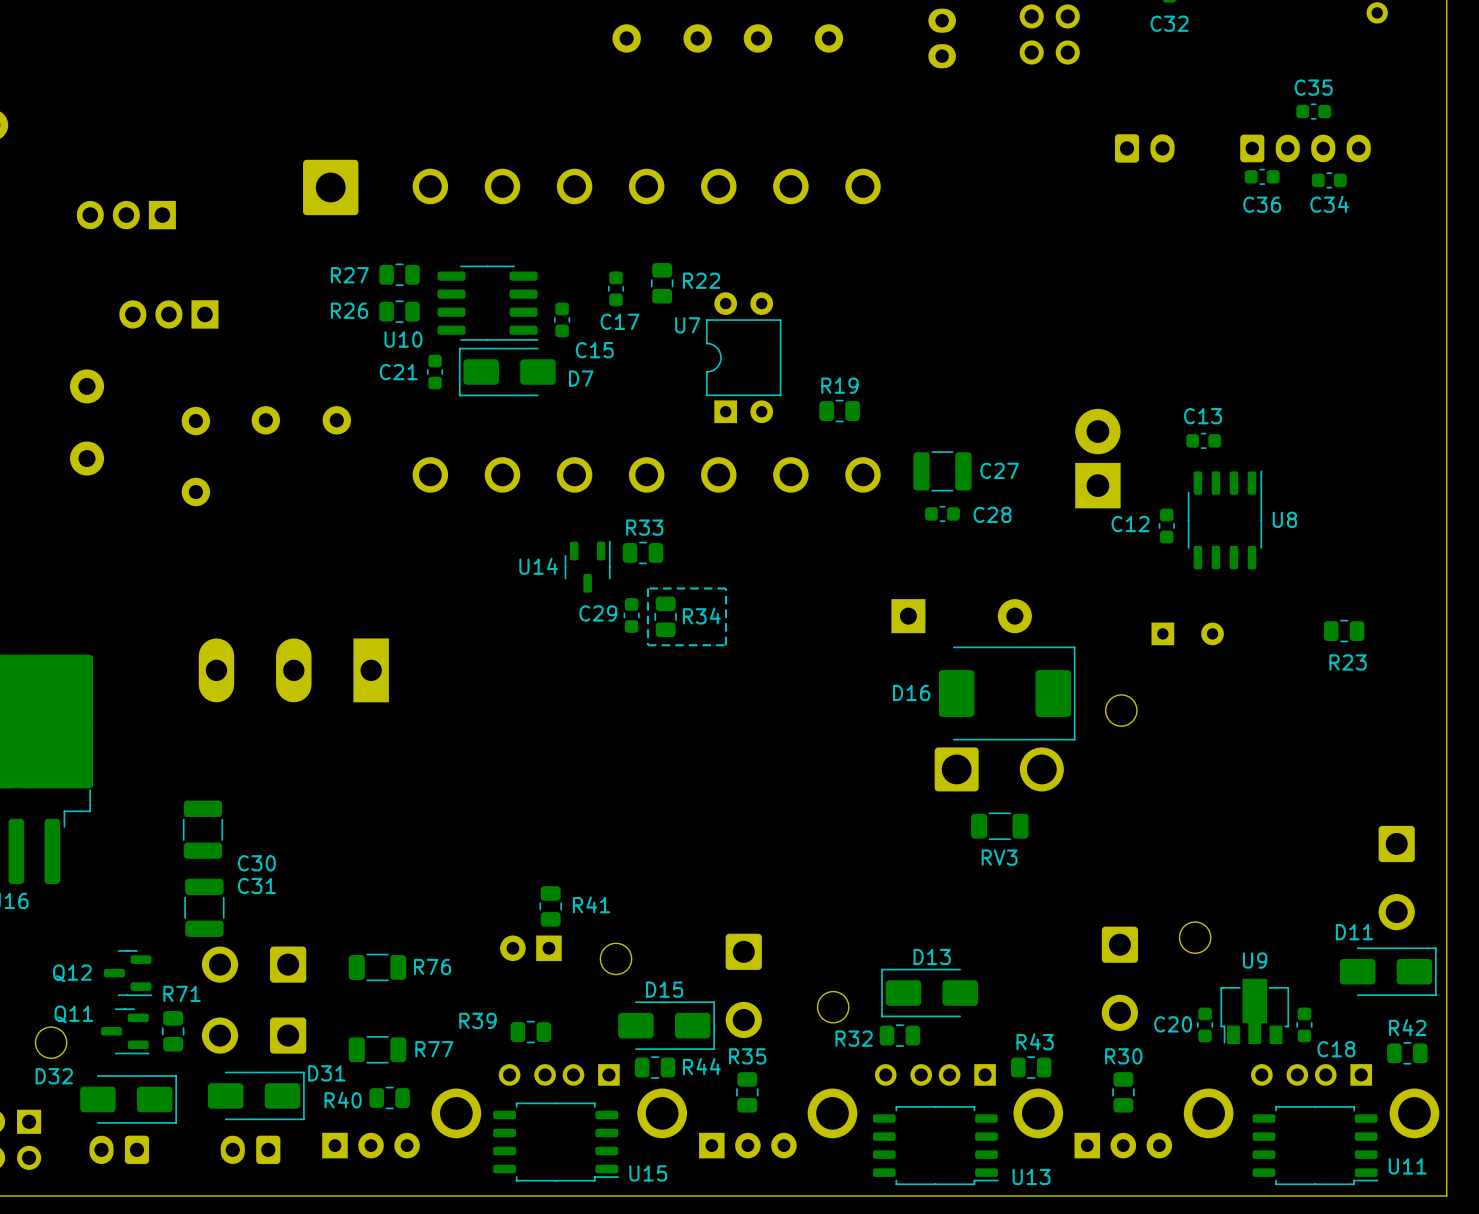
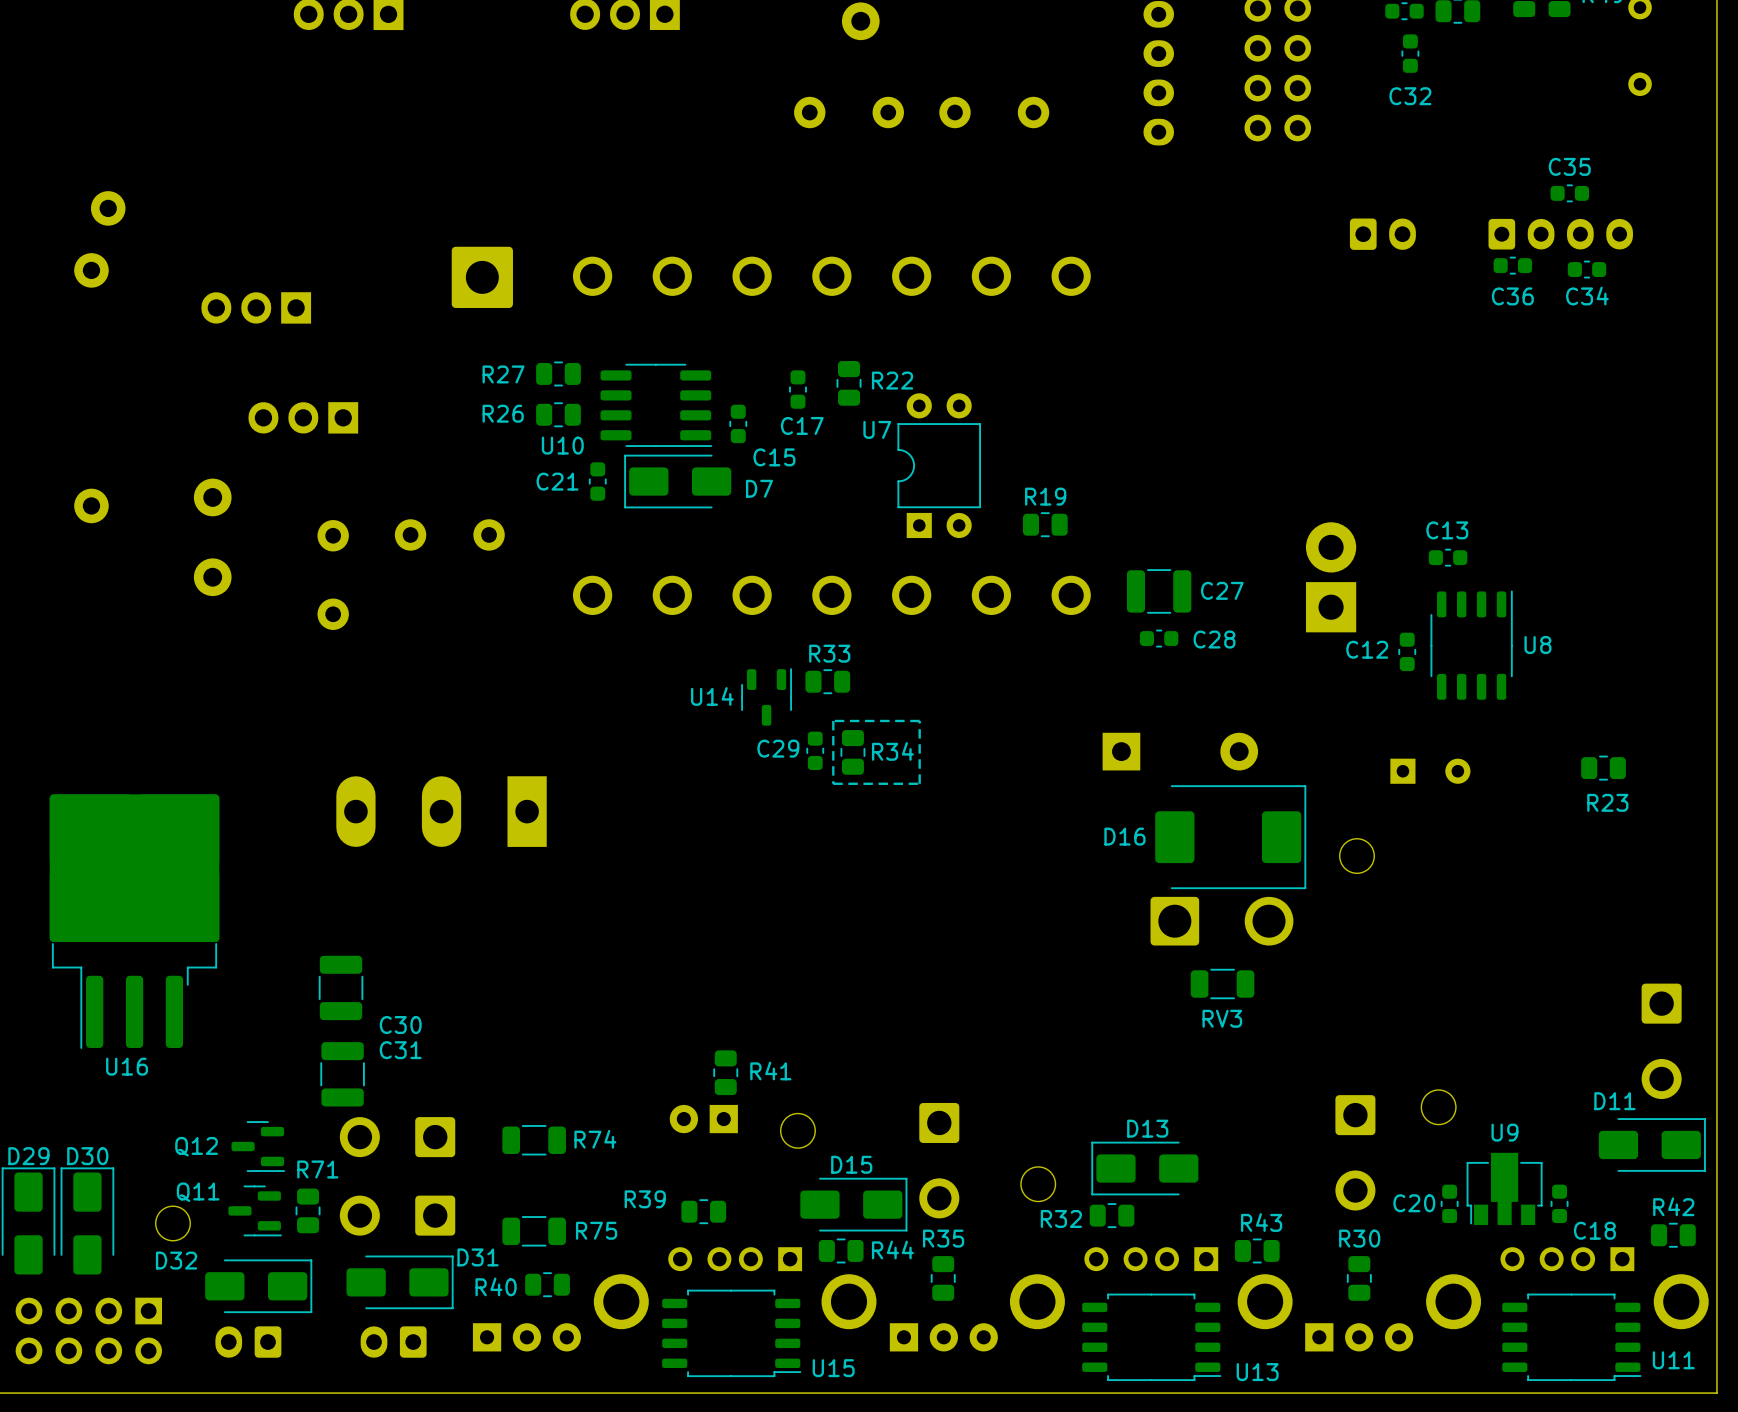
R76 name: R76 (432, 966) -> R74 (595, 1139)
R77 name: R77 (434, 1049) -> R75 (596, 1230)

